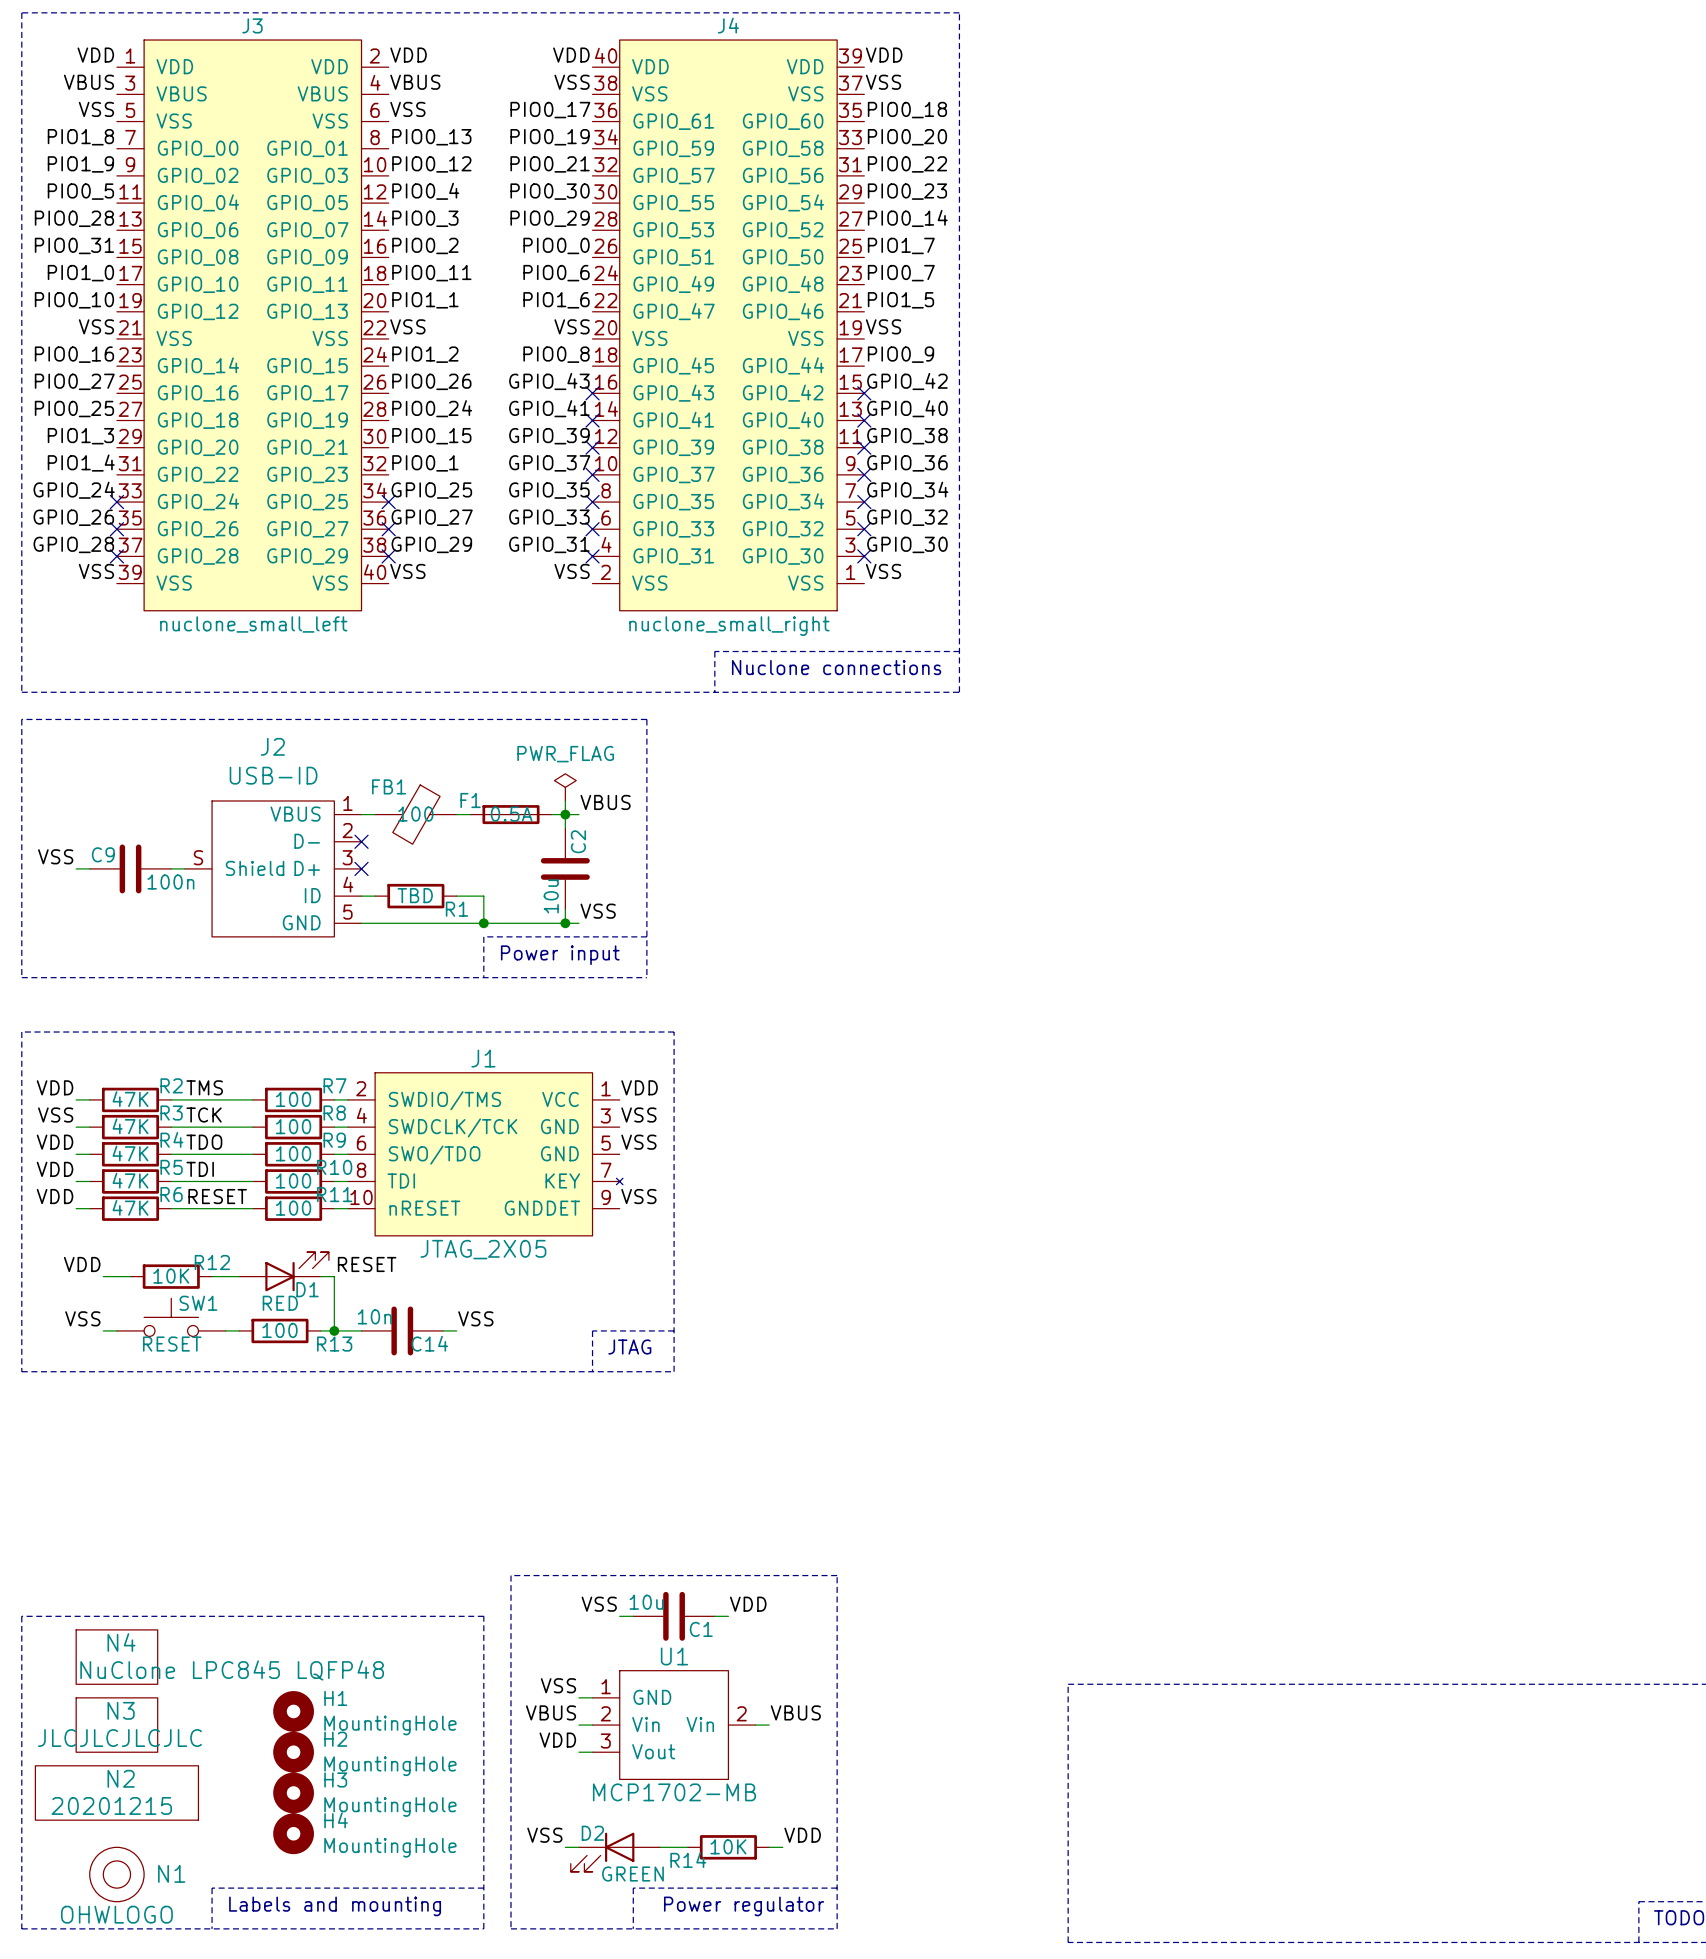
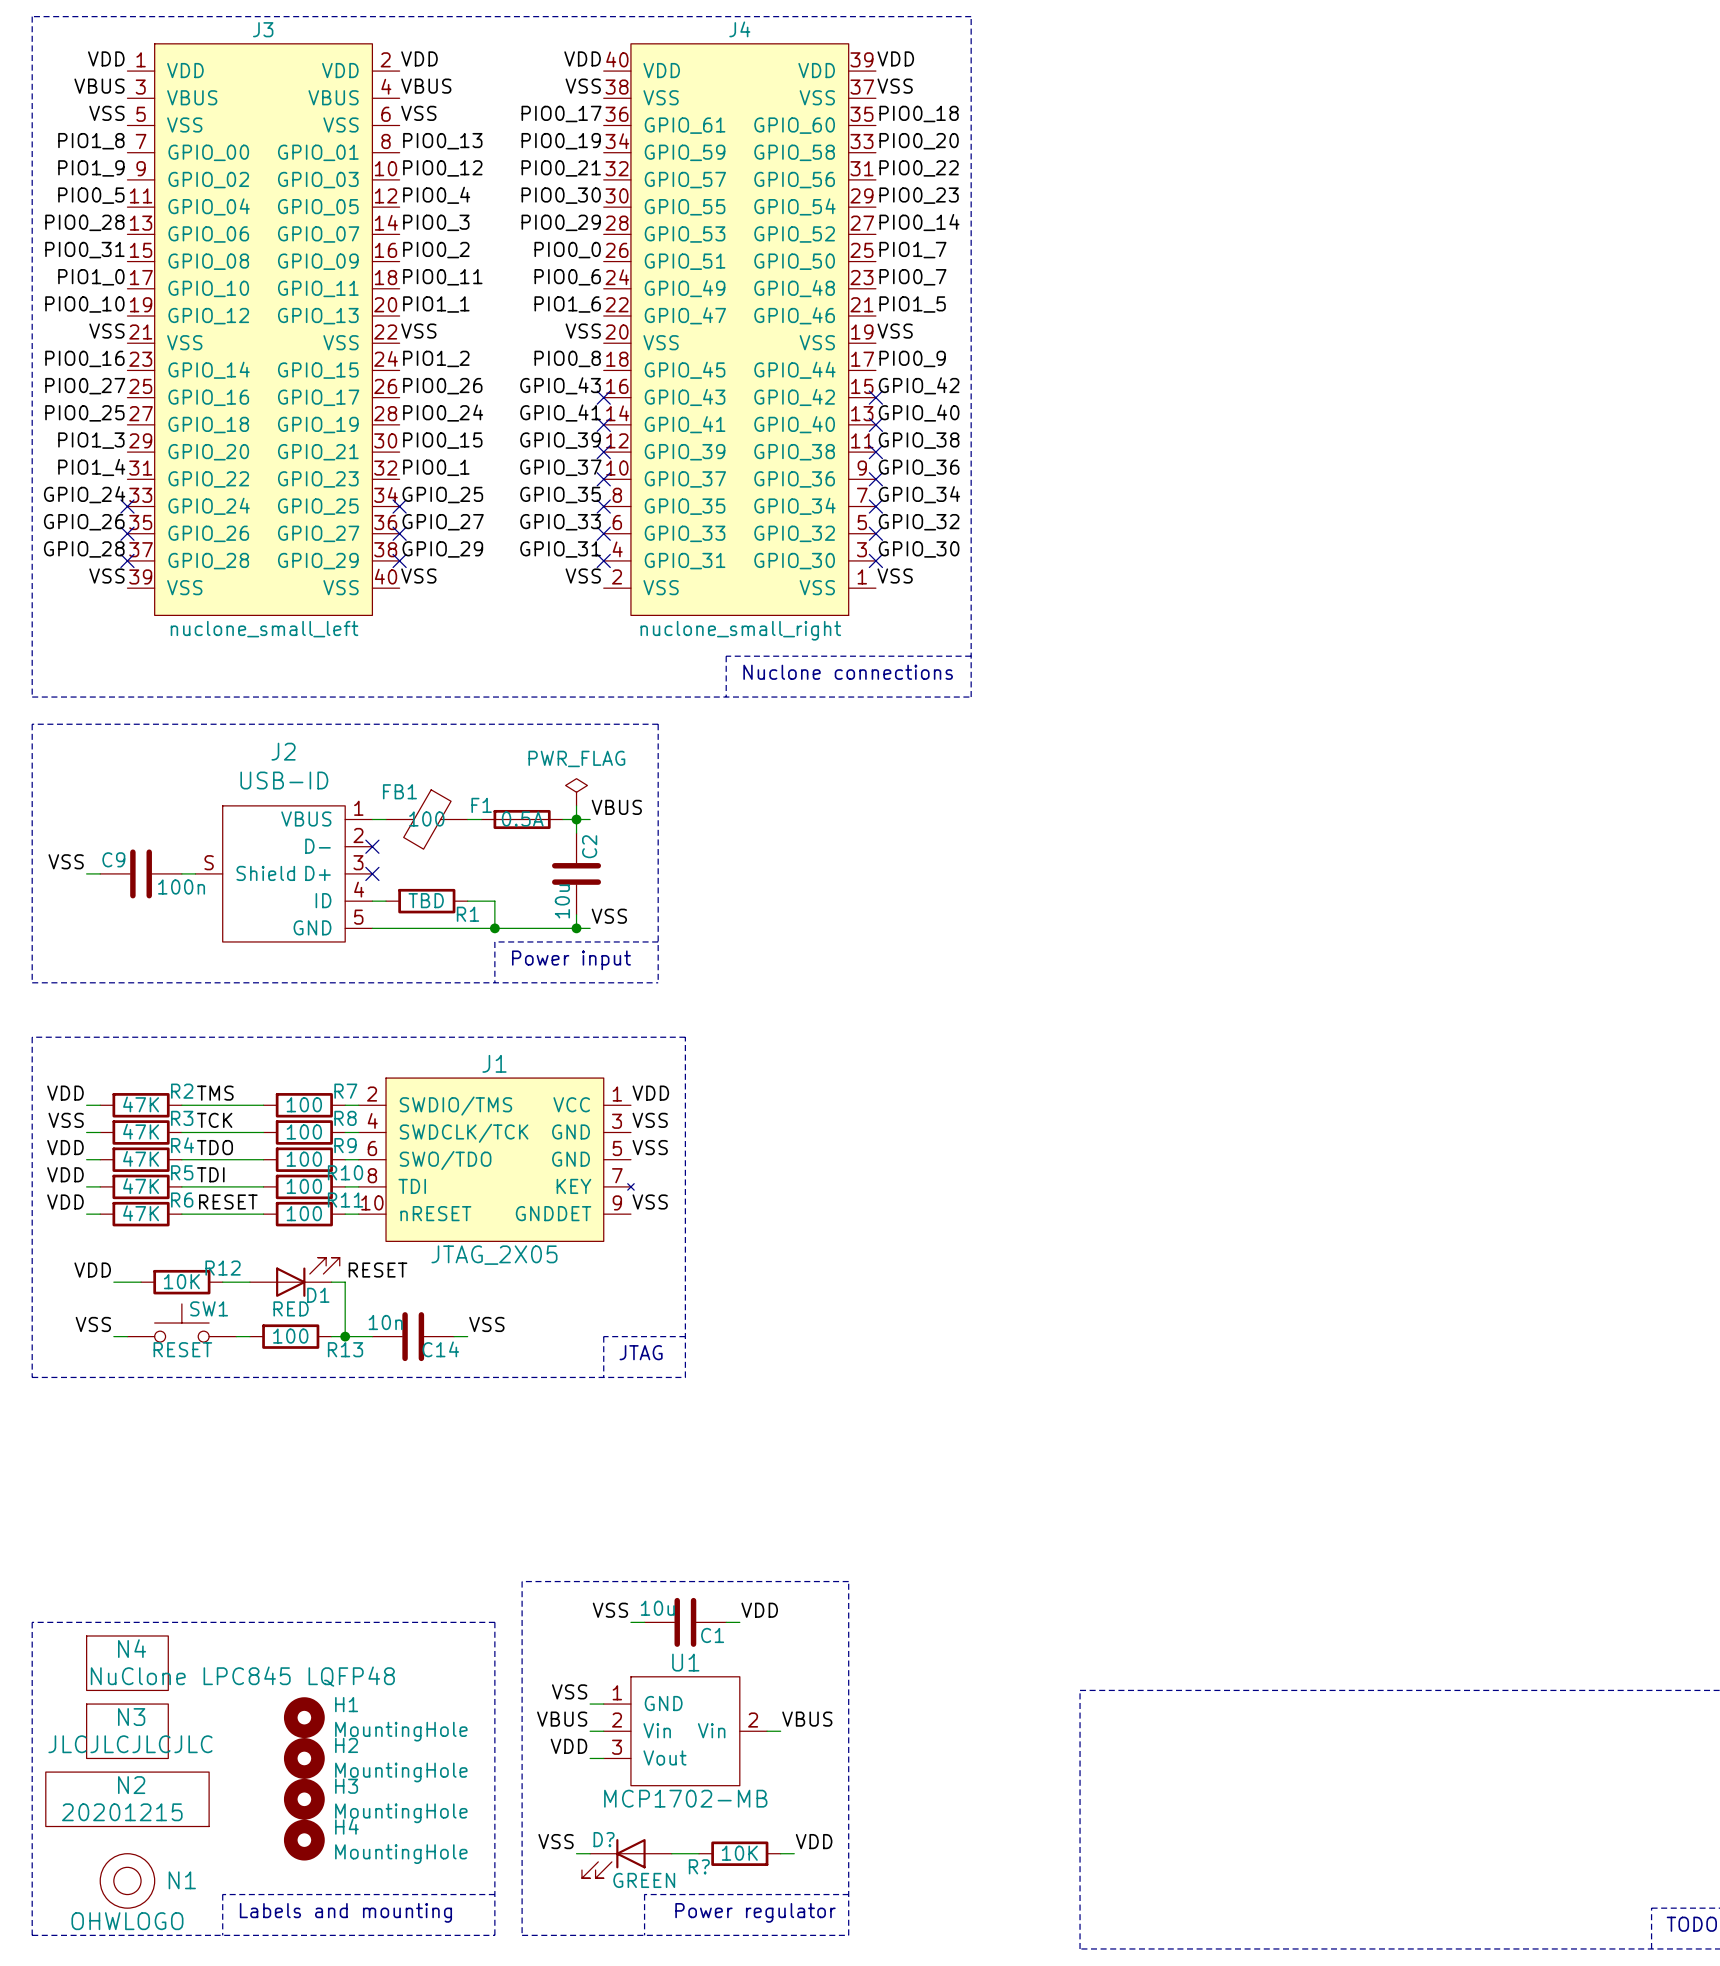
D2 name: D2 (592, 1833) -> D? (604, 1839)
R14 name: R14 (688, 1860) -> R? (699, 1866)

